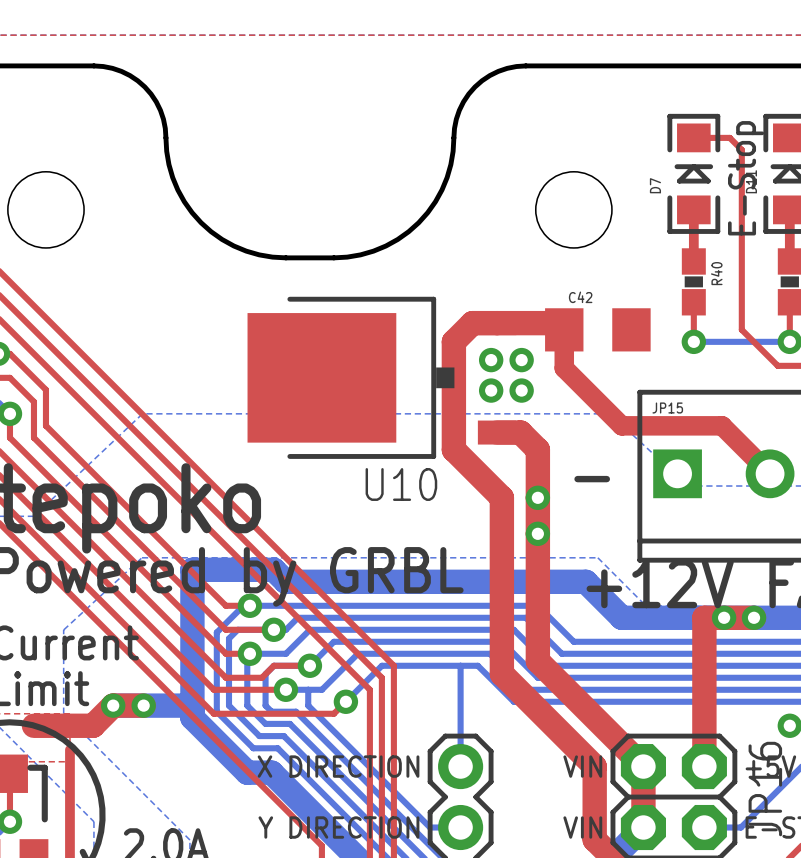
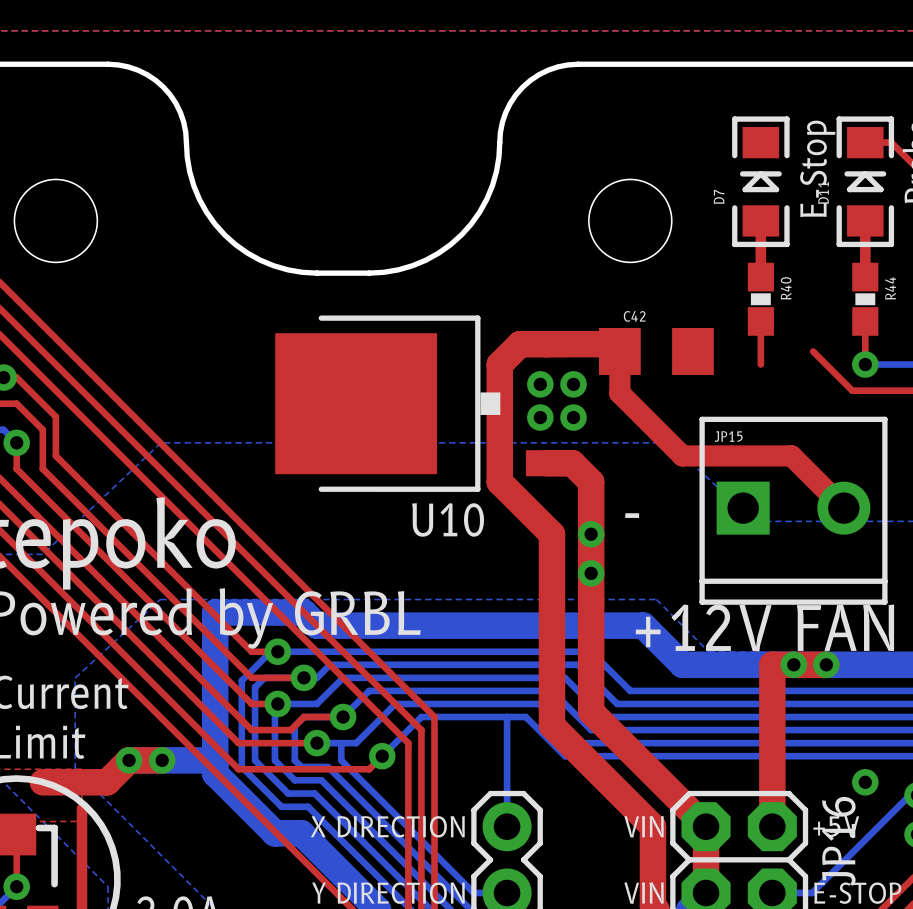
top track: (693, 137) (729, 137) (741, 149) (741, 329) -> none
bottom track: (693, 341) (789, 341) -> none
via: (693, 341) -> none

